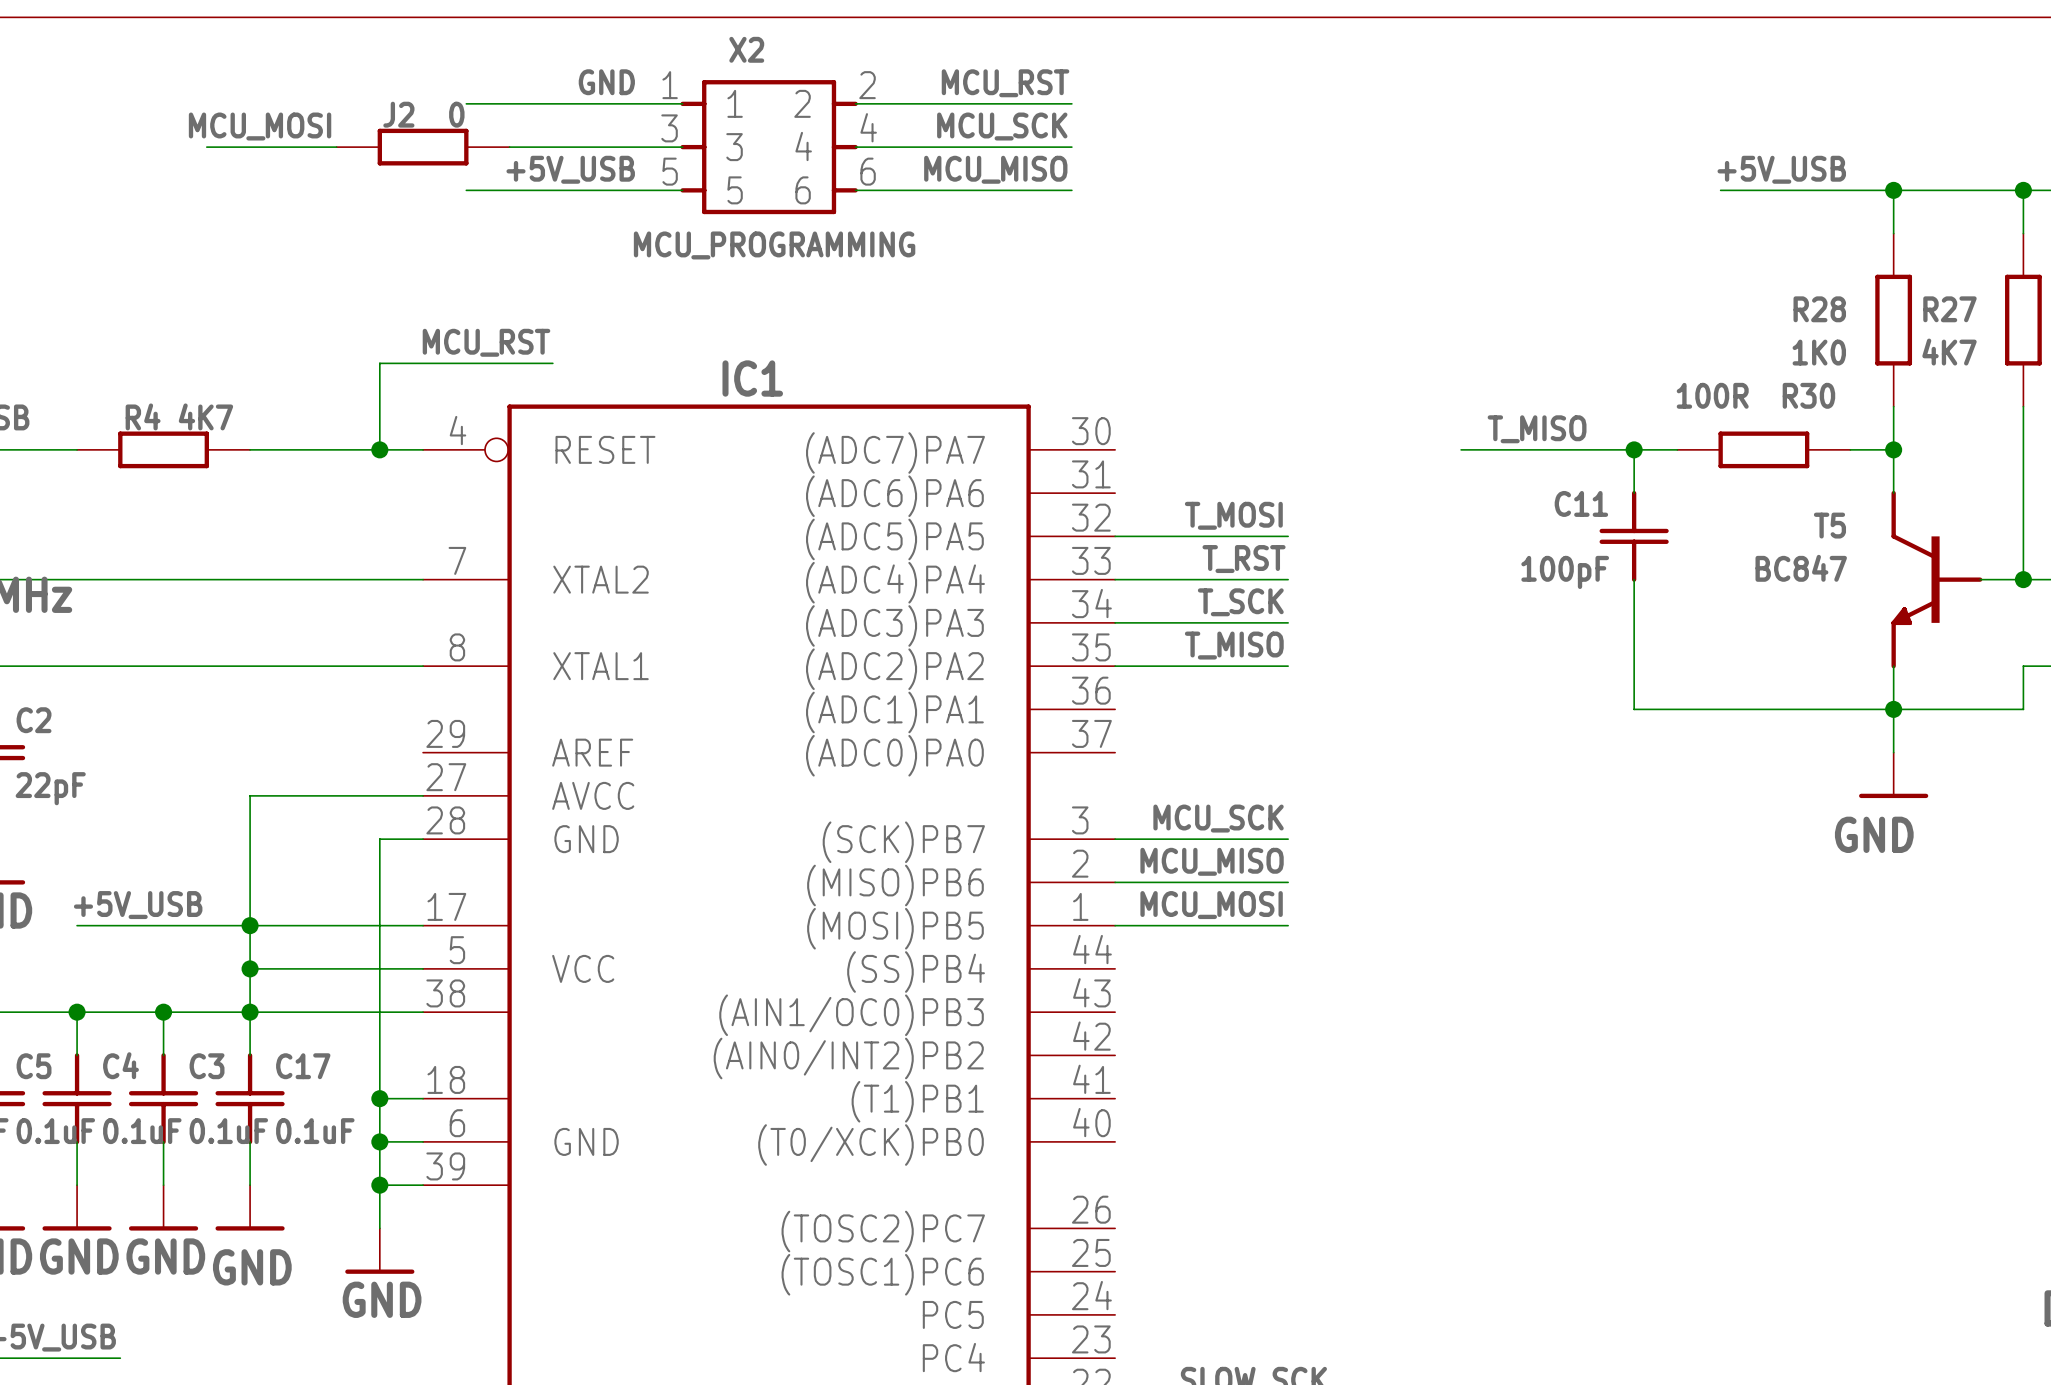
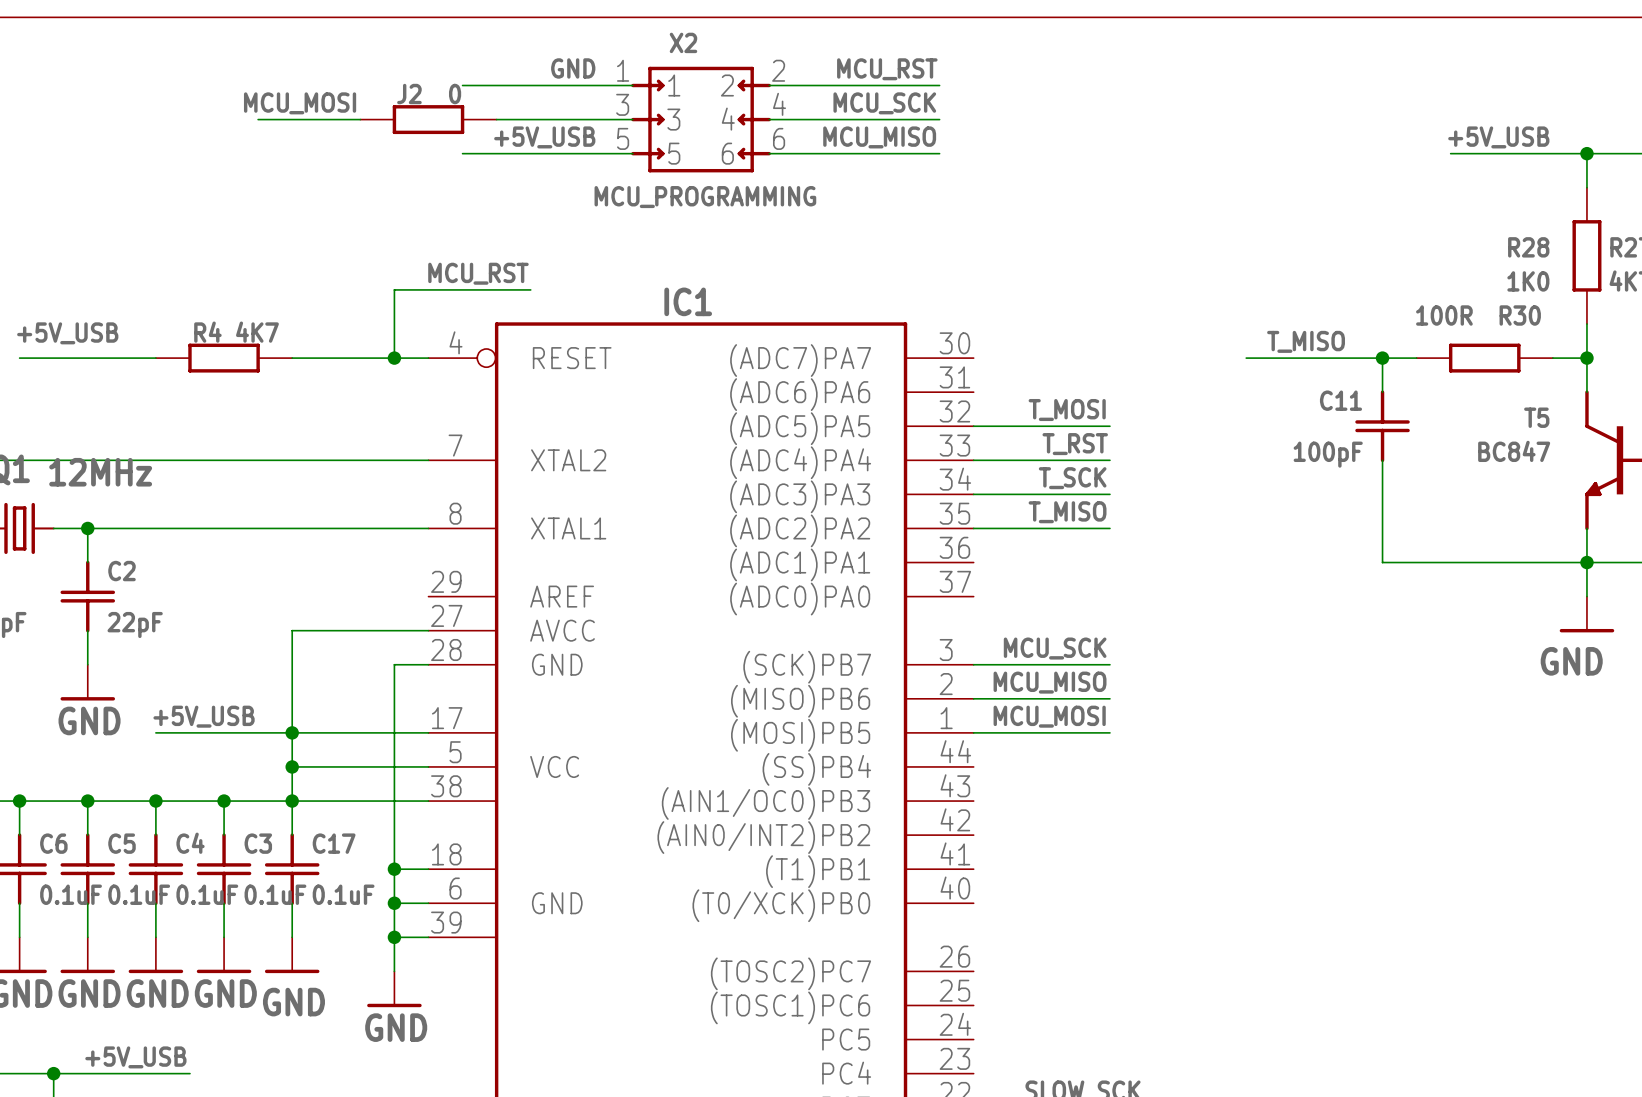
X2 symbol: [680, 80, 858, 215] -> [631, 66, 771, 173]

